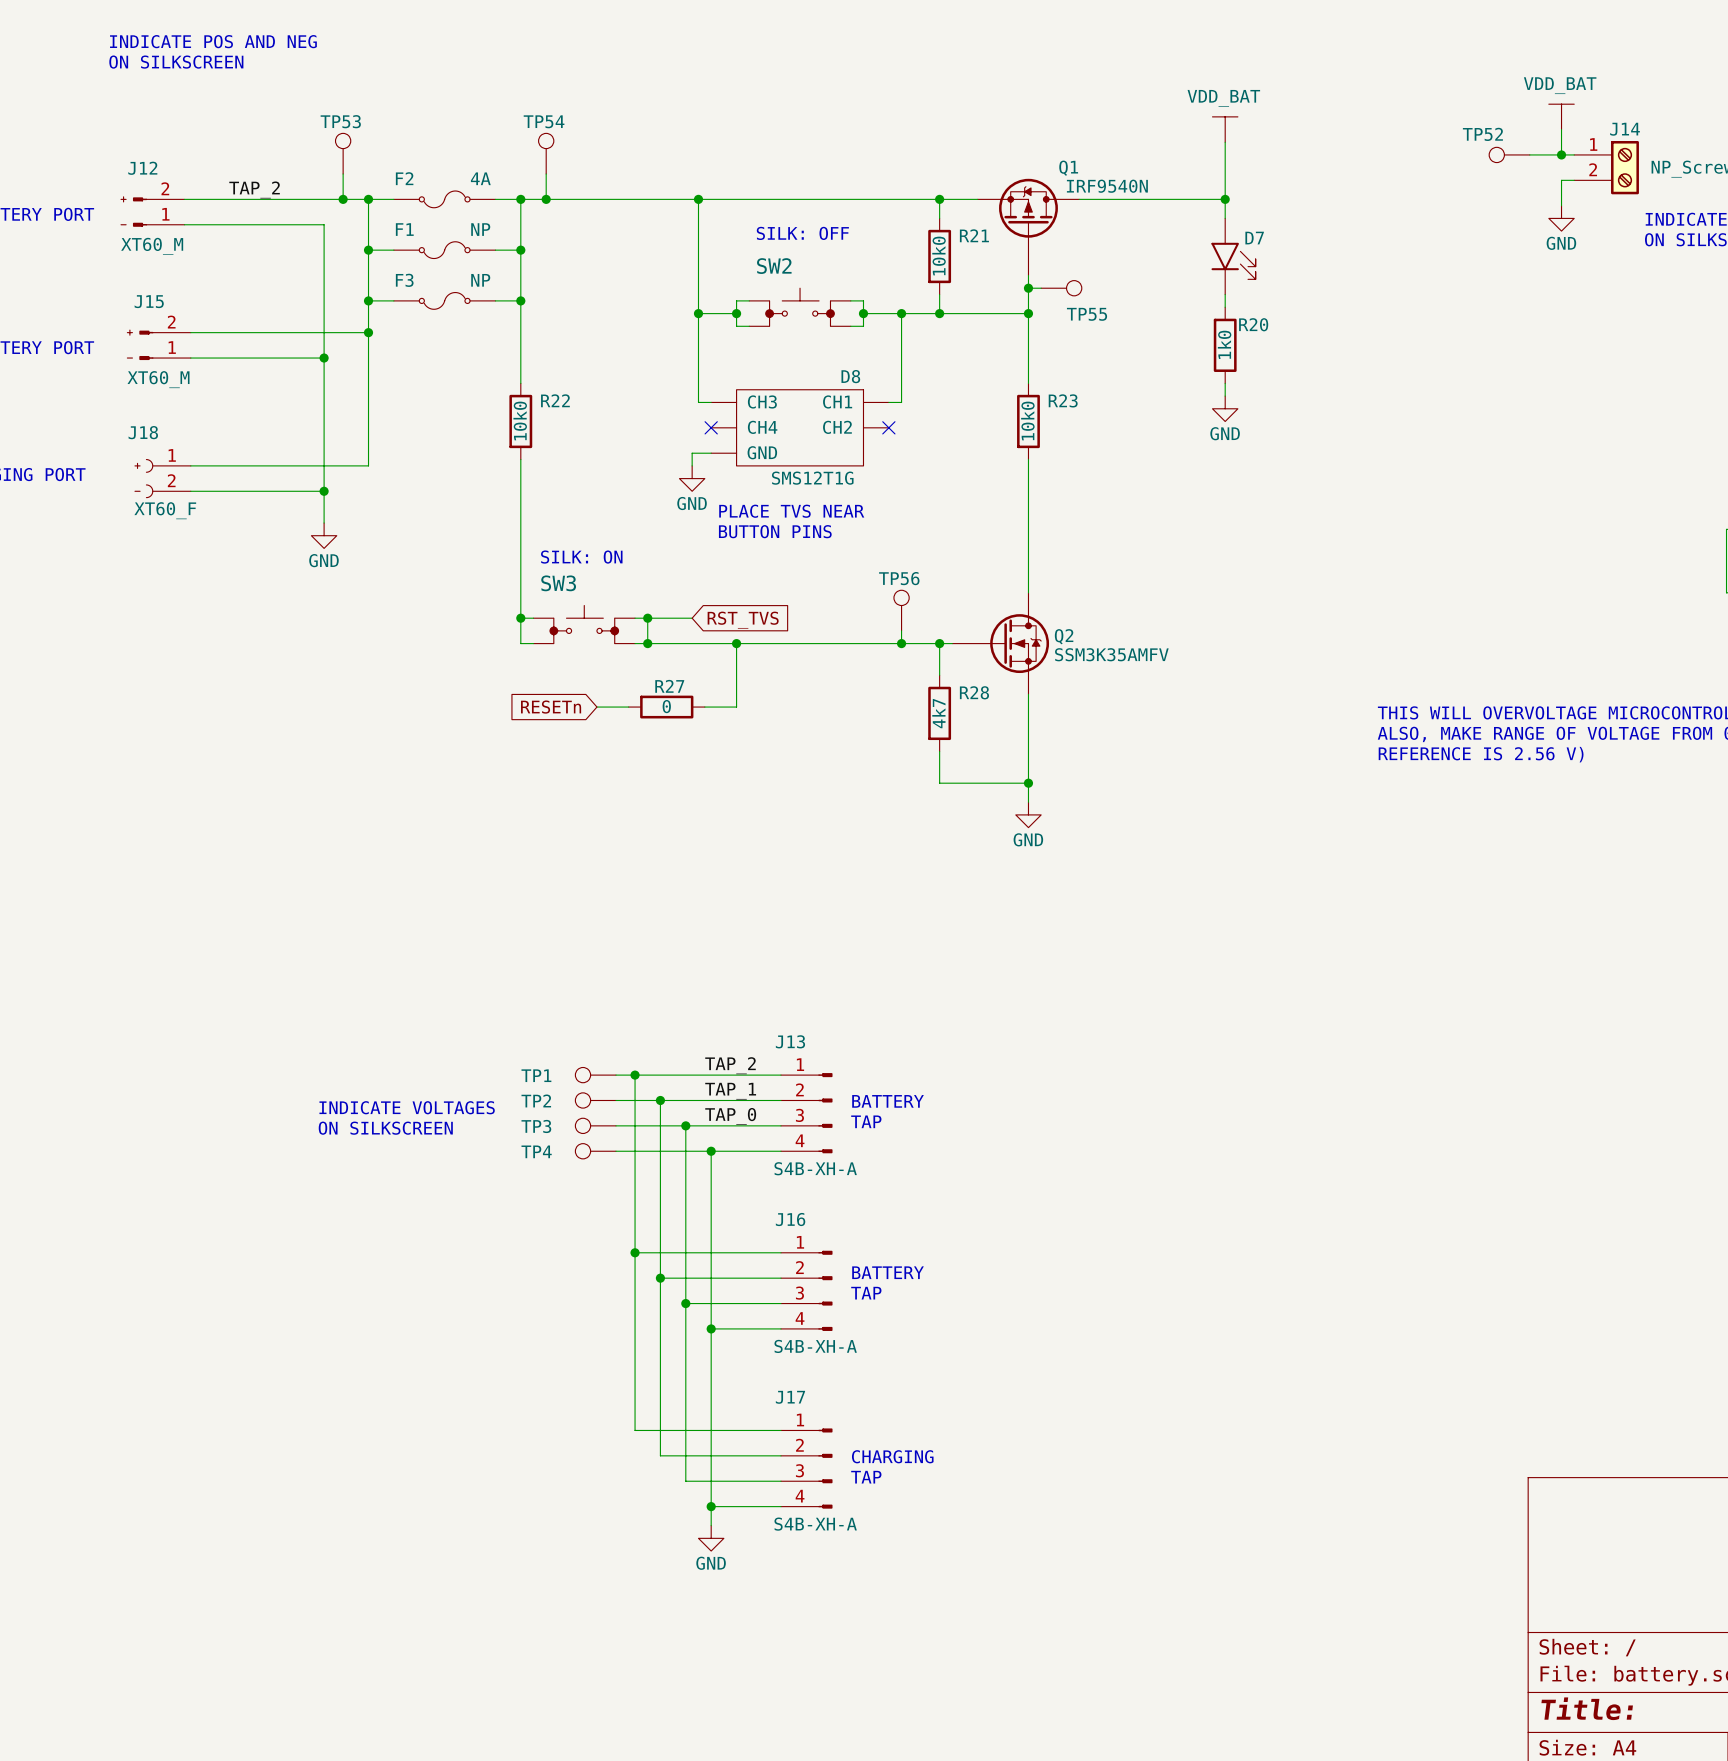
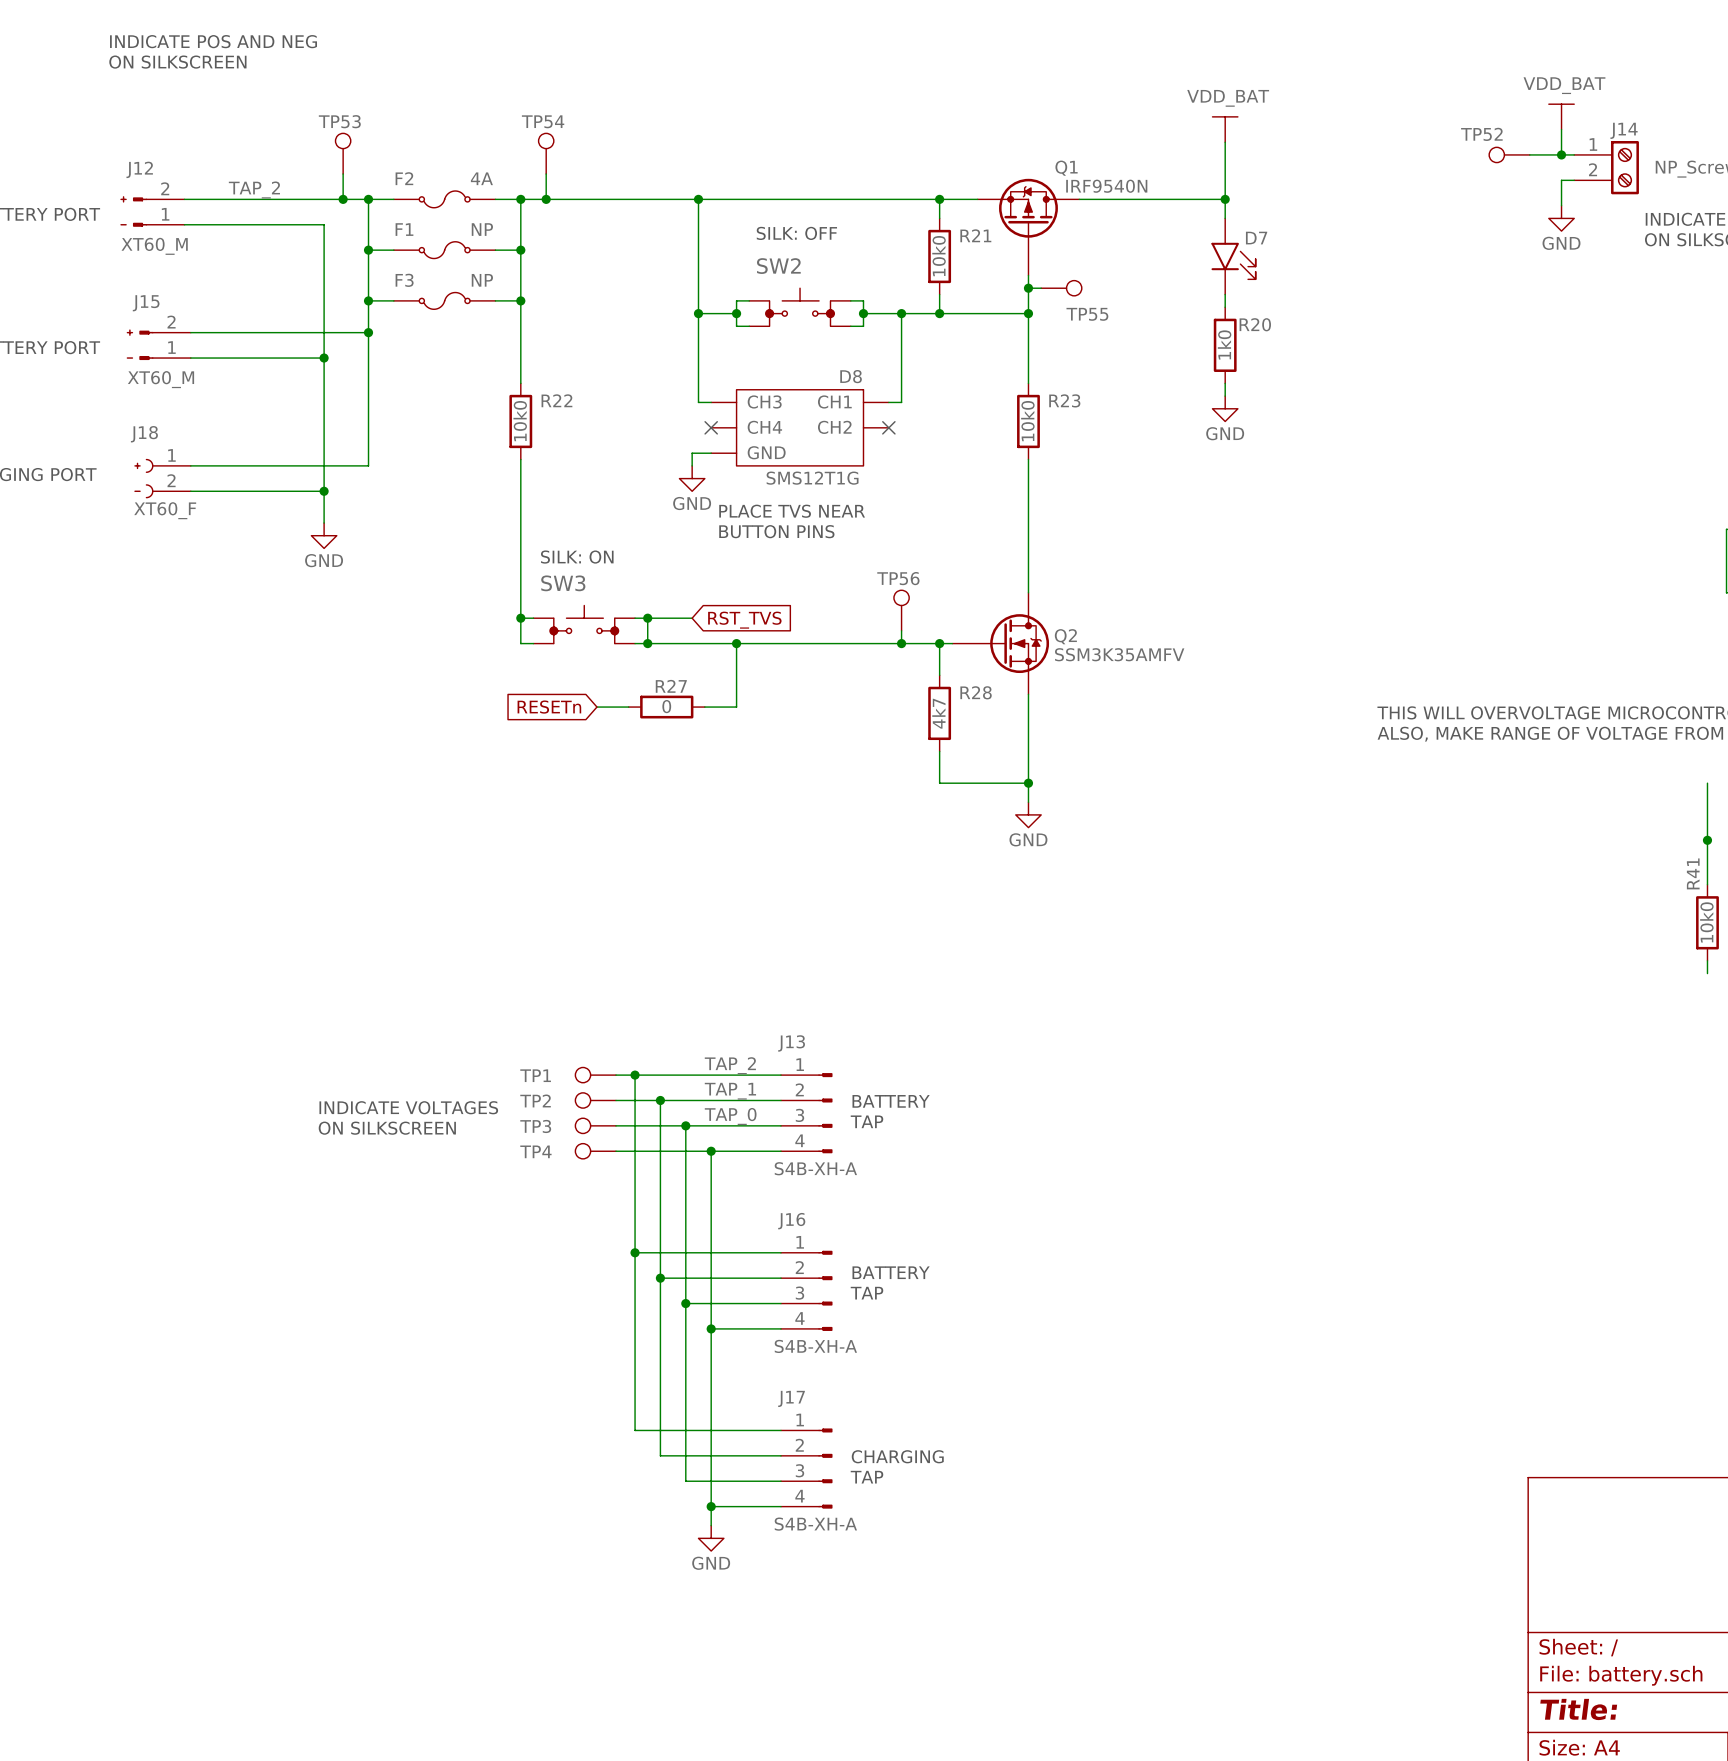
text: REFERENCE IS 2.56 V) (1481, 754) -> none
wire: none -> (1707, 783) (1707, 884)
junction: none -> (1707, 840)
R41: none -> (1707, 922)
wire: none -> (1707, 960) (1707, 973)

